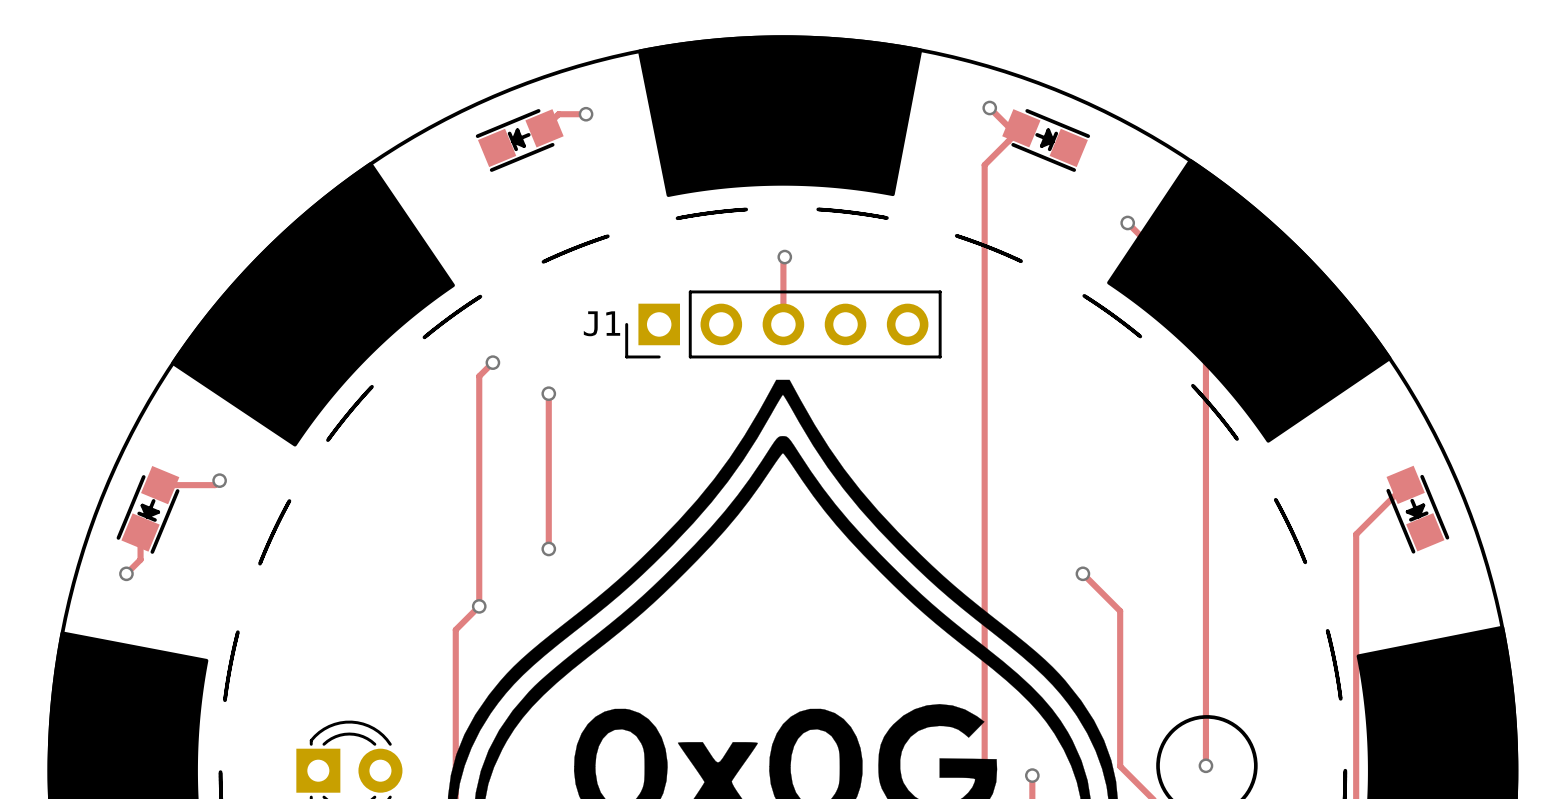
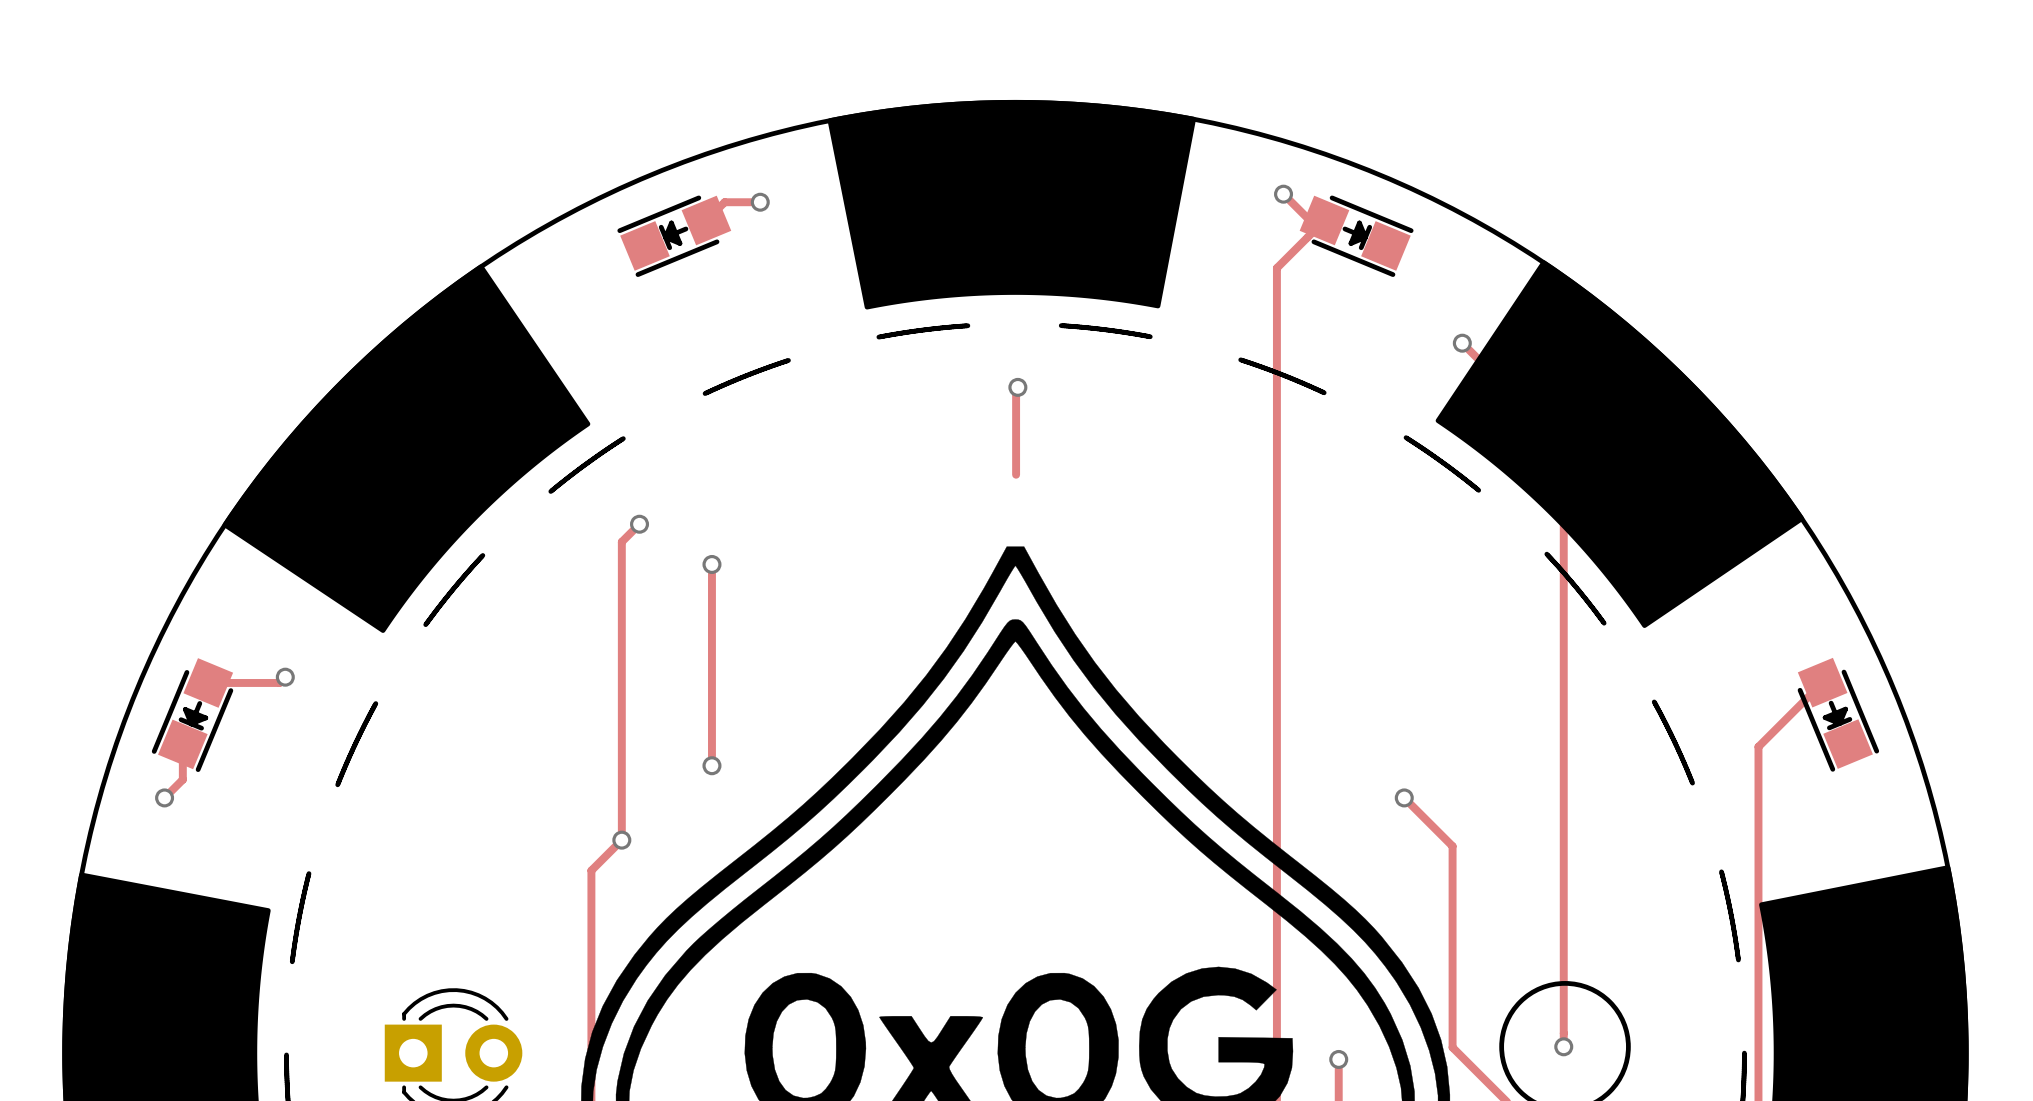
J1: (783, 324) -> none

